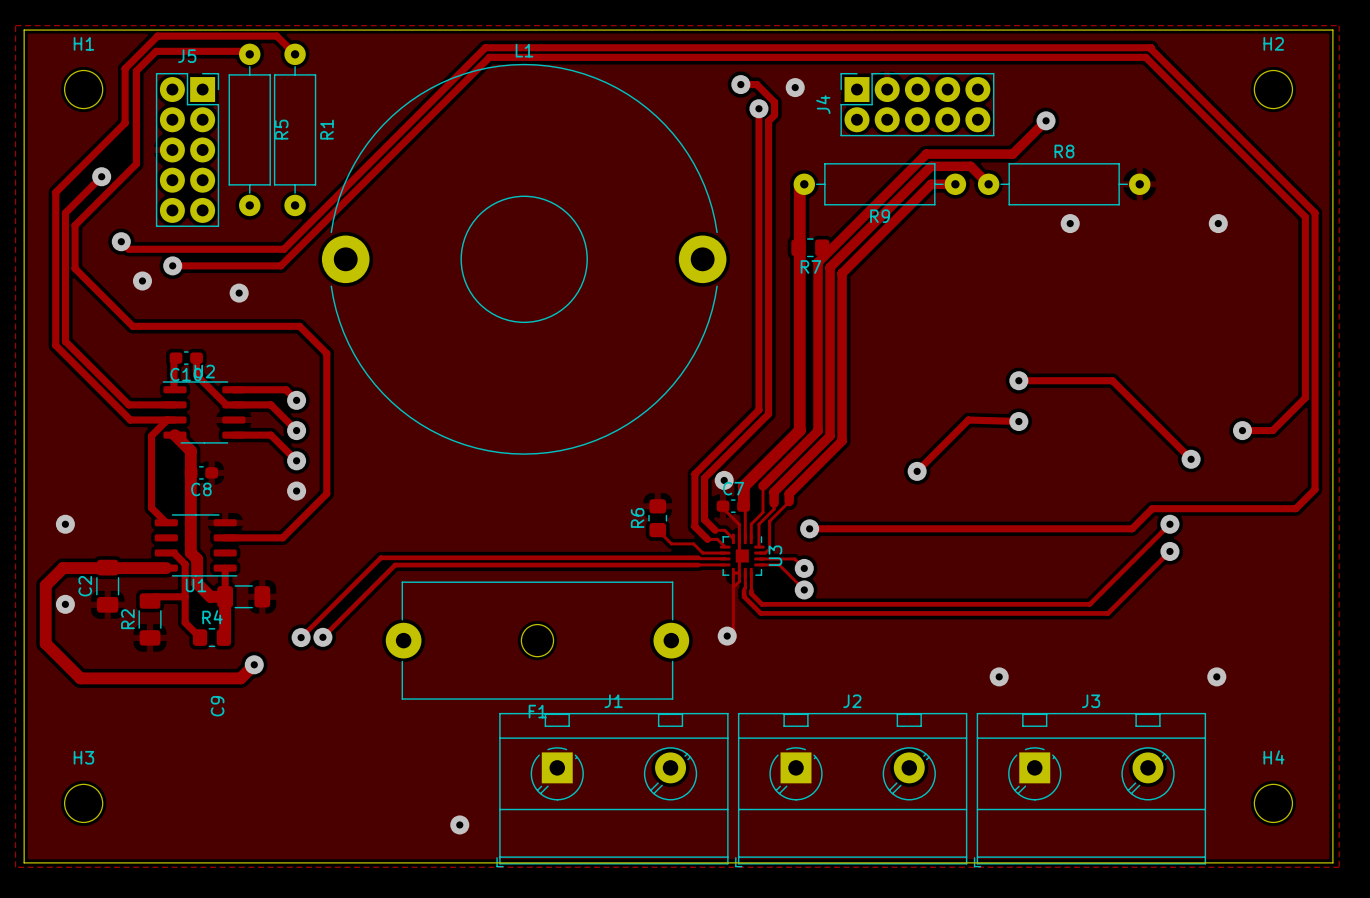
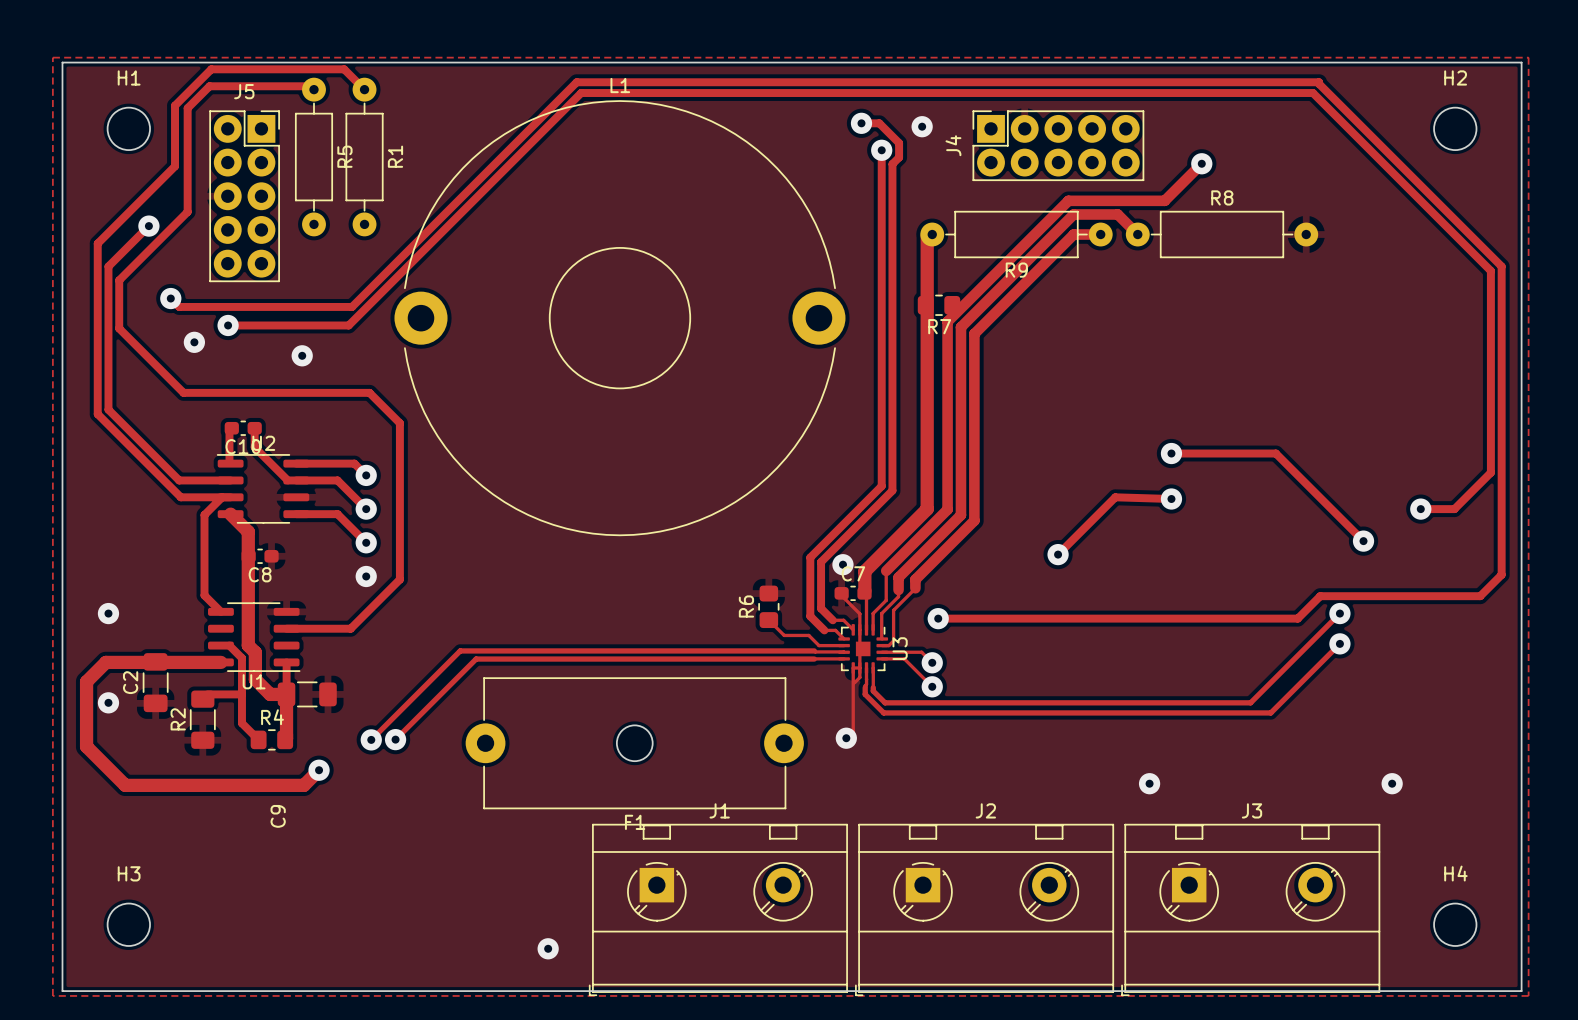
R5 footprint: [228, 43, 271, 217] -> [295, 77, 333, 237]
R1 footprint: [273, 43, 317, 217] -> [345, 77, 384, 237]
via: (1070, 223) -> none
via: (1218, 223) -> none

